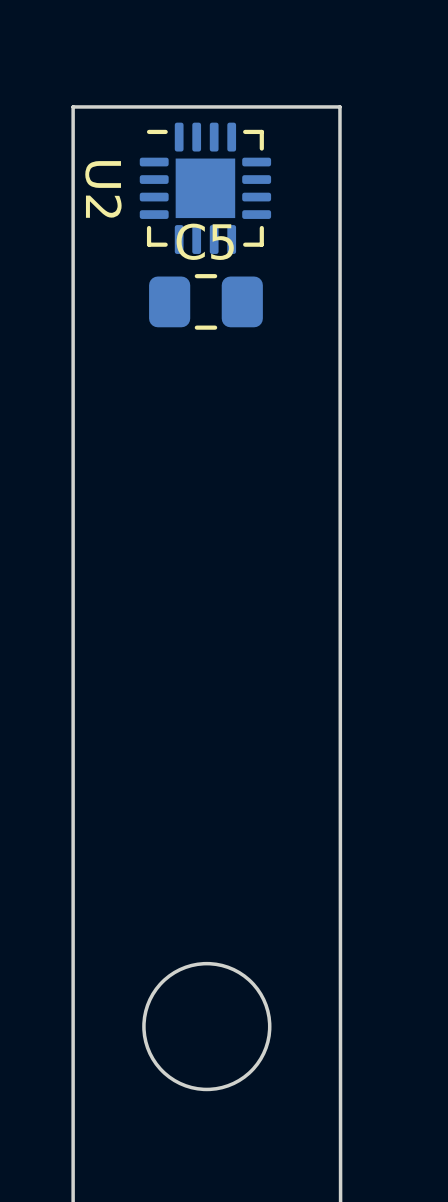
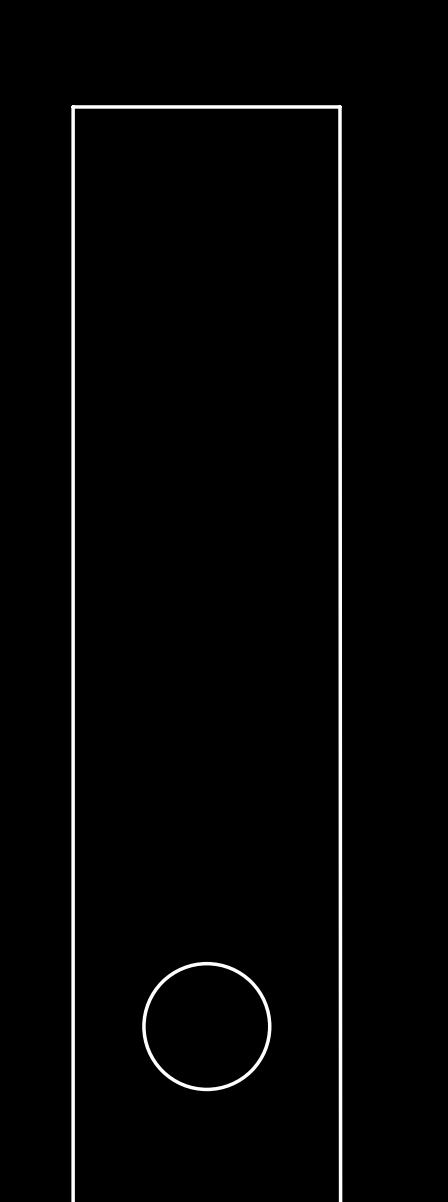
U2: (205, 188) -> none
C5: (205, 301) -> none

